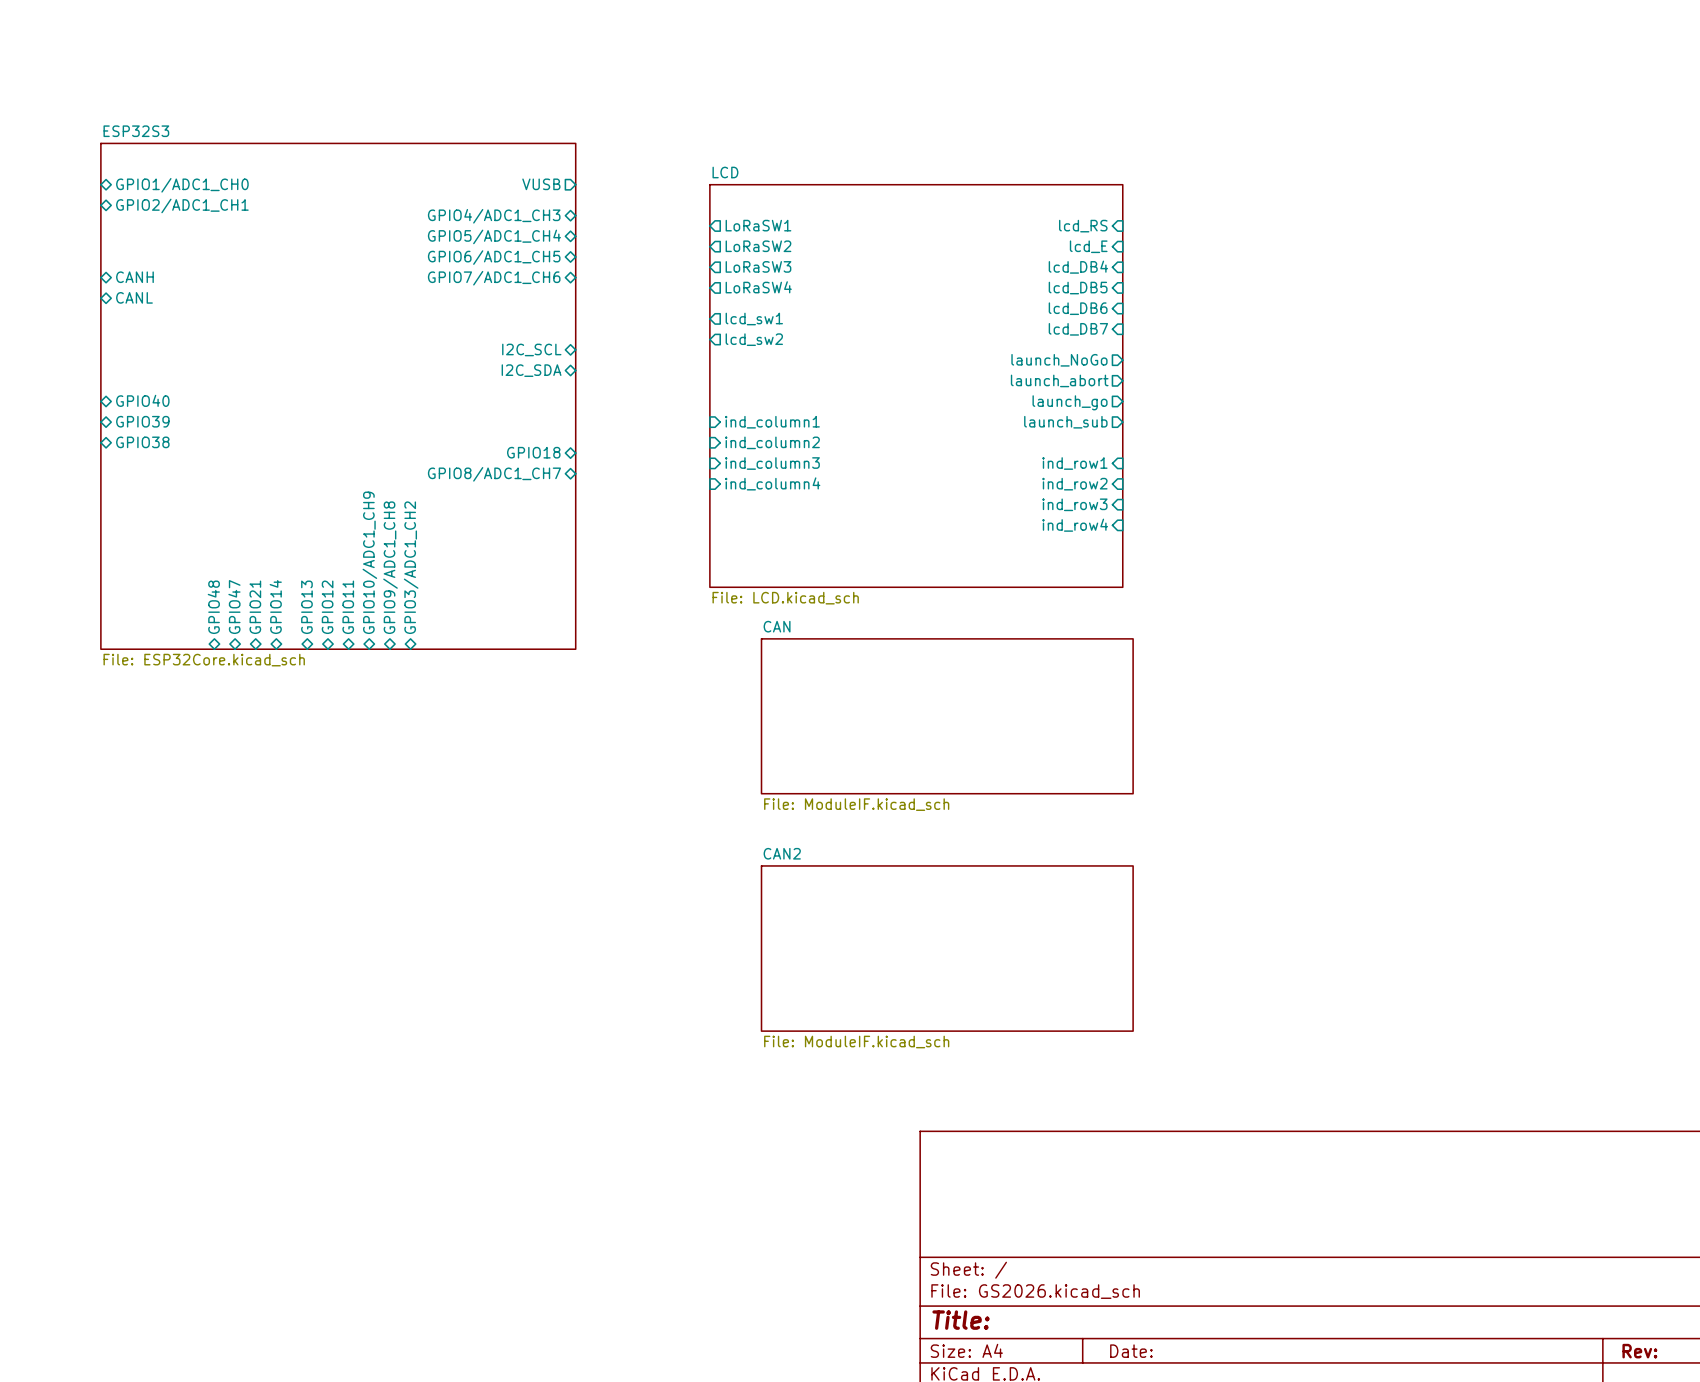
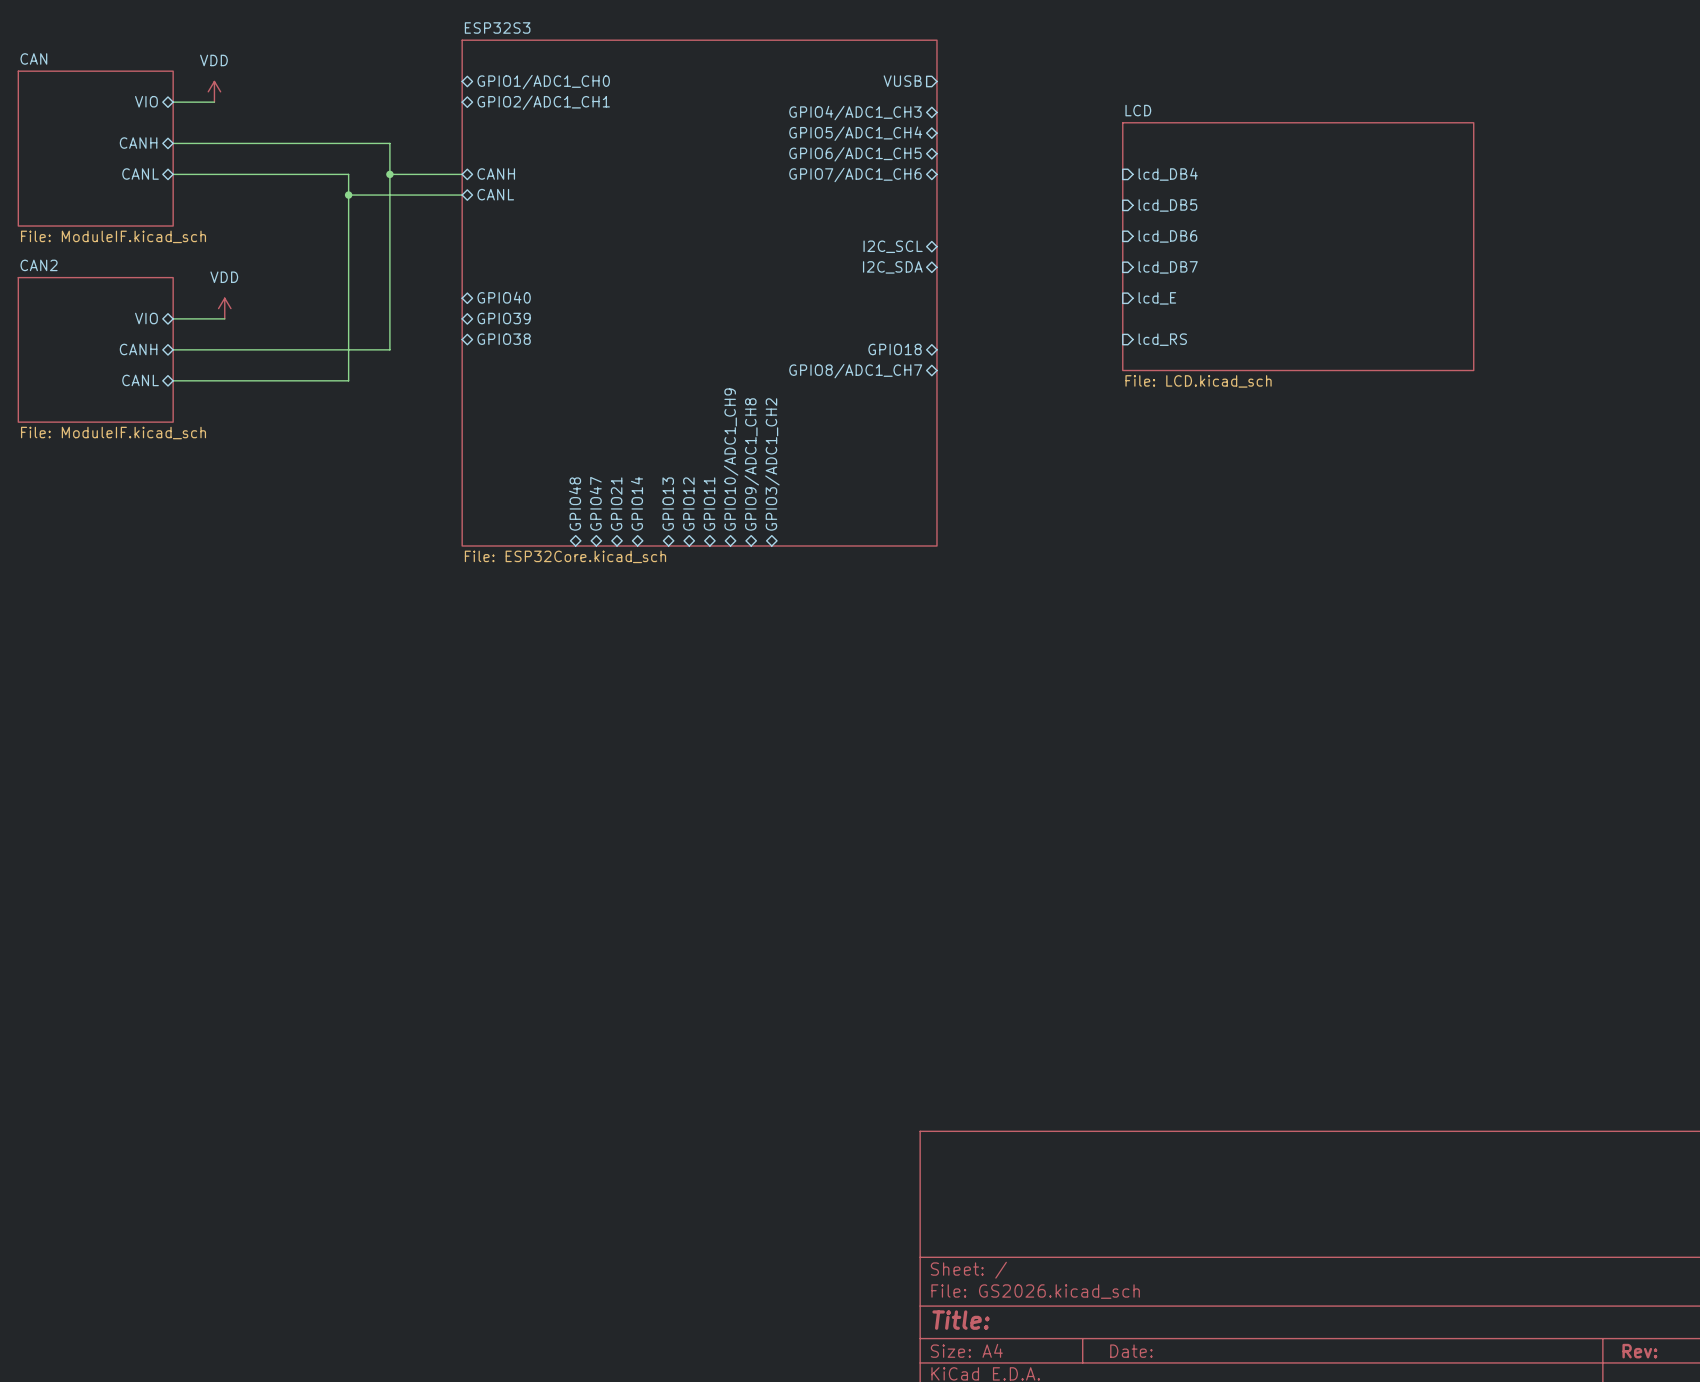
sheet pin: none -> VUSB (902, 81)
sheet pin: none -> GPIO1/ADC1_CH0 (543, 82)
power symbol: none -> VDD (214, 91)
sheet pin: none -> VIO (146, 101)
wire: none -> (173, 102) (214, 102)
sheet pin: none -> GPIO2/ADC1_CH1 (543, 102)
sheet pin: none -> GPIO4/ADC1_CH3 (855, 113)
sheet pin: none -> GPIO5/ADC1_CH4 (855, 133)
sheet pin: none -> CANH (138, 143)
wire: none -> (173, 143) (389, 143) (389, 349) (173, 349)
sheet CAN: none -> File: ModuleIF.kicad_sch (95, 148)
sheet pin: none -> GPIO6/ADC1_CH5 (855, 154)
sheet pin: none -> CANL (140, 174)
wire: none -> (173, 174) (348, 174) (348, 380) (173, 380)
wire: none -> (389, 174) (462, 174)
junction: none -> (389, 174)
sheet pin: none -> CANH (496, 174)
sheet pin: none -> GPIO7/ADC1_CH6 (855, 174)
sheet pin: VUSB (541, 184) -> none
sheet pin: GPIO1/ADC1_CH0 (182, 185) -> none
sheet pin: none -> CANL (495, 194)
wire: none -> (348, 195) (462, 195)
junction: none -> (348, 195)
sheet pin: GPIO2/ADC1_CH1 (182, 205) -> none
sheet pin: GPIO4/ADC1_CH3 (494, 216) -> none
sheet pin: LoRaSW1 (758, 225) -> none
sheet pin rotation: 0° (1083, 226) -> 180° (1162, 339)
sheet pin position: lcd_RS (1083, 226) -> lcd_RS (1162, 339)
sheet pin: GPIO5/ADC1_CH4 (494, 236) -> none
sheet pin: LoRaSW2 (758, 246) -> none
sheet pin: none -> I2C_SCL (893, 246)
sheet pin rotation: 0° (1088, 246) -> 180° (1157, 298)
sheet pin position: lcd_E (1088, 246) -> lcd_E (1157, 298)
sheet LCD: none -> File: LCD.kicad_sch (1298, 246)
sheet pin: GPIO6/ADC1_CH5 (494, 257) -> none
sheet pin: LoRaSW3 (758, 266) -> none
sheet pin: none -> I2C_SDA (892, 267)
sheet pin rotation: 0° (1078, 267) -> 180° (1168, 174)
sheet pin position: lcd_DB4 (1078, 267) -> lcd_DB4 (1168, 174)
sheet pin: CANH (134, 277) -> none
sheet pin: GPIO7/ADC1_CH6 (494, 278) -> none
sheet pin: LoRaSW4 (758, 287) -> none
sheet pin rotation: 0° (1078, 288) -> 180° (1167, 205)
sheet pin position: lcd_DB5 (1078, 288) -> lcd_DB5 (1167, 205)
sheet pin: CANL (134, 297) -> none
sheet pin: none -> GPIO40 (504, 297)
power symbol: none -> VDD (224, 308)
sheet pin rotation: 0° (1078, 308) -> 180° (1167, 236)
sheet pin position: lcd_DB6 (1078, 308) -> lcd_DB6 (1167, 236)
sheet pin: none -> VIO (146, 318)
wire: none -> (173, 318) (224, 318)
sheet pin: none -> GPIO39 (504, 318)
sheet pin: lcd_sw1 (754, 319) -> none
sheet pin rotation: 0° (1078, 329) -> 180° (1168, 267)
sheet pin position: lcd_DB7 (1078, 329) -> lcd_DB7 (1168, 267)
sheet pin: none -> GPIO38 (504, 339)
sheet pin: lcd_sw2 (754, 339) -> none
sheet pin: none -> CANH (138, 349)
sheet pin: I2C_SCL (531, 349) -> none
sheet pin: none -> GPIO18 (895, 349)
sheet pin: launch_NoGo (1059, 360) -> none
sheet pin: I2C_SDA (531, 370) -> none
sheet pin: none -> GPIO8/ADC1_CH7 (855, 371)
sheet pin: none -> CANL (140, 380)
sheet pin: launch_abort (1059, 380) -> none
sheet LCD: File: LCD.kicad_sch (916, 385) -> none
sheet ESP32S3 position: (338, 396) -> (699, 293)
sheet pin: GPIO40 (142, 400) -> none
sheet pin: launch_go (1070, 402) -> none
sheet pin: GPIO39 (142, 421) -> none
sheet pin: ind_column1 (772, 422) -> none
sheet pin: launch_sub (1065, 422) -> none
sheet pin: GPIO38 (142, 442) -> none
sheet pin: ind_column2 (772, 442) -> none
sheet pin: GPIO18 (533, 452) -> none
sheet pin: none -> GPIO10/ADC1_CH9 (731, 459)
sheet pin: ind_column3 (772, 463) -> none
sheet pin: ind_row1 (1074, 463) -> none
sheet pin: none -> GPIO9/ADC1_CH8 (751, 464)
sheet pin: none -> GPIO3/ADC1_CH2 (772, 464)
sheet pin: GPIO8/ADC1_CH7 (494, 474) -> none
sheet pin: ind_column4 (772, 483) -> none
sheet pin: ind_row2 (1074, 484) -> none
sheet pin: none -> GPIO47 (595, 503)
sheet pin: none -> GPIO14 (637, 503)
sheet pin: none -> GPIO48 (575, 504)
sheet pin: none -> GPIO21 (616, 504)
sheet pin: none -> GPIO13 (668, 504)
sheet pin: none -> GPIO12 (688, 504)
sheet pin: none -> GPIO11 (709, 504)
sheet pin: ind_row3 (1074, 504) -> none
sheet pin: ind_row4 (1075, 525) -> none
sheet pin: GPIO10/ADC1_CH9 (369, 562) -> none
sheet pin: GPIO9/ADC1_CH8 (390, 567) -> none
sheet pin: GPIO3/ADC1_CH2 (411, 567) -> none
sheet pin: GPIO48 (213, 607) -> none
sheet pin: GPIO47 (234, 607) -> none
sheet pin: GPIO21 (255, 607) -> none
sheet pin: GPIO14 (275, 607) -> none
sheet pin: GPIO13 (306, 607) -> none
sheet pin: GPIO12 (327, 607) -> none
sheet pin: GPIO11 (348, 607) -> none
sheet CAN: File: ModuleIF.kicad_sch (947, 716) -> none
sheet CAN2 name position: CAN2 (782, 853) -> CAN2 (39, 265)
sheet CAN2 shape: [760, 865, 1134, 1032] -> [17, 276, 174, 423]
sheet CAN2 value position: File: ModuleIF.kicad_sch (856, 1042) -> File: ModuleIF.kicad_sch (113, 433)

